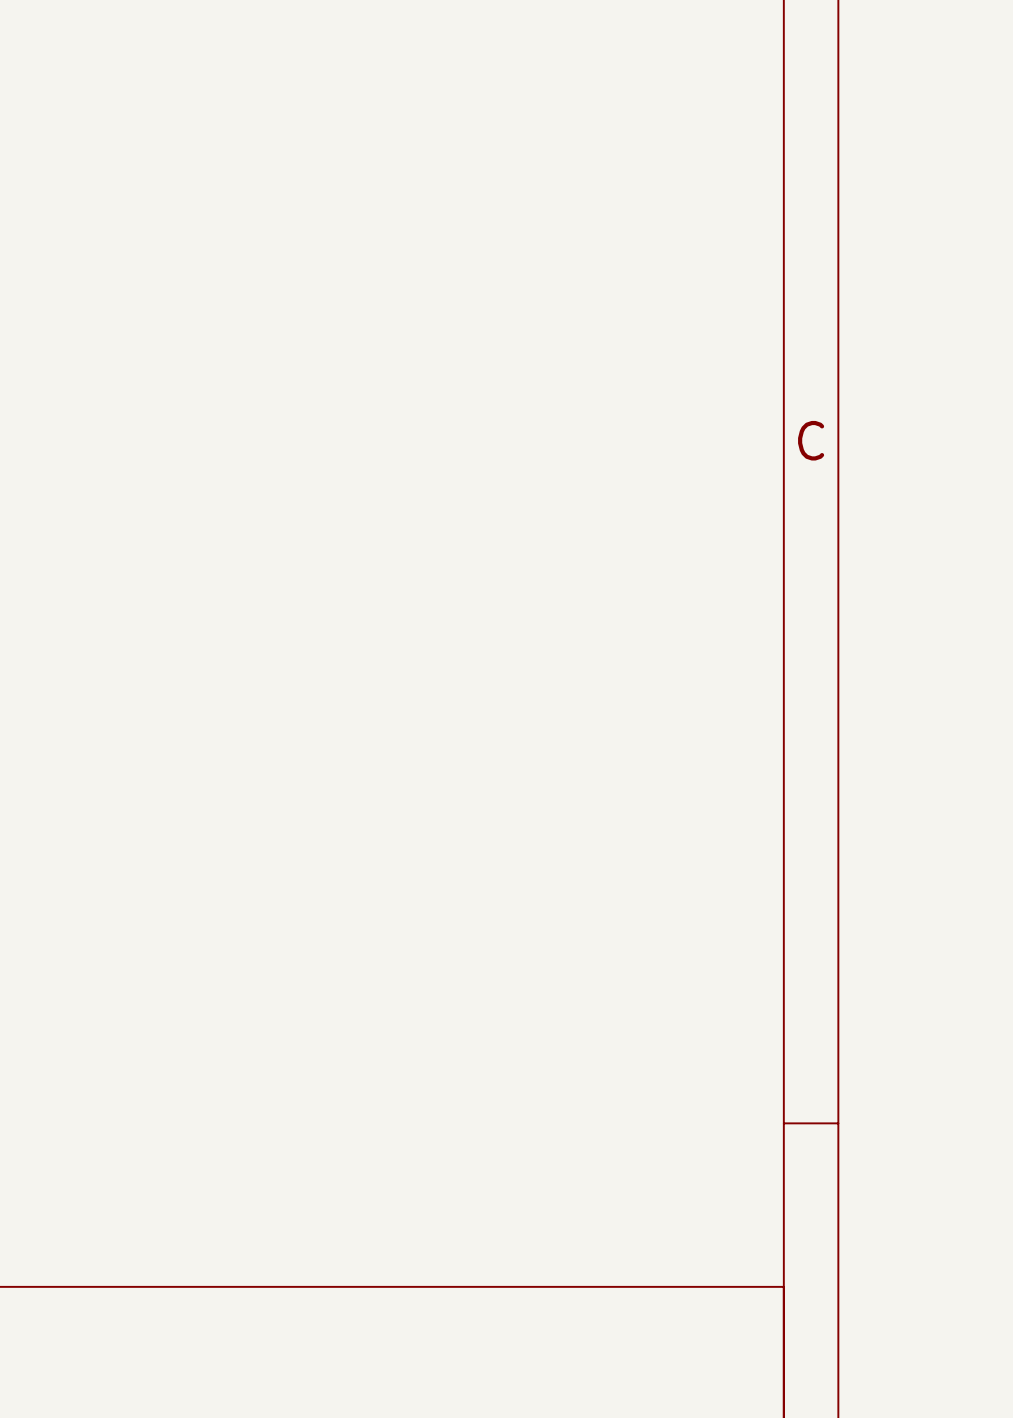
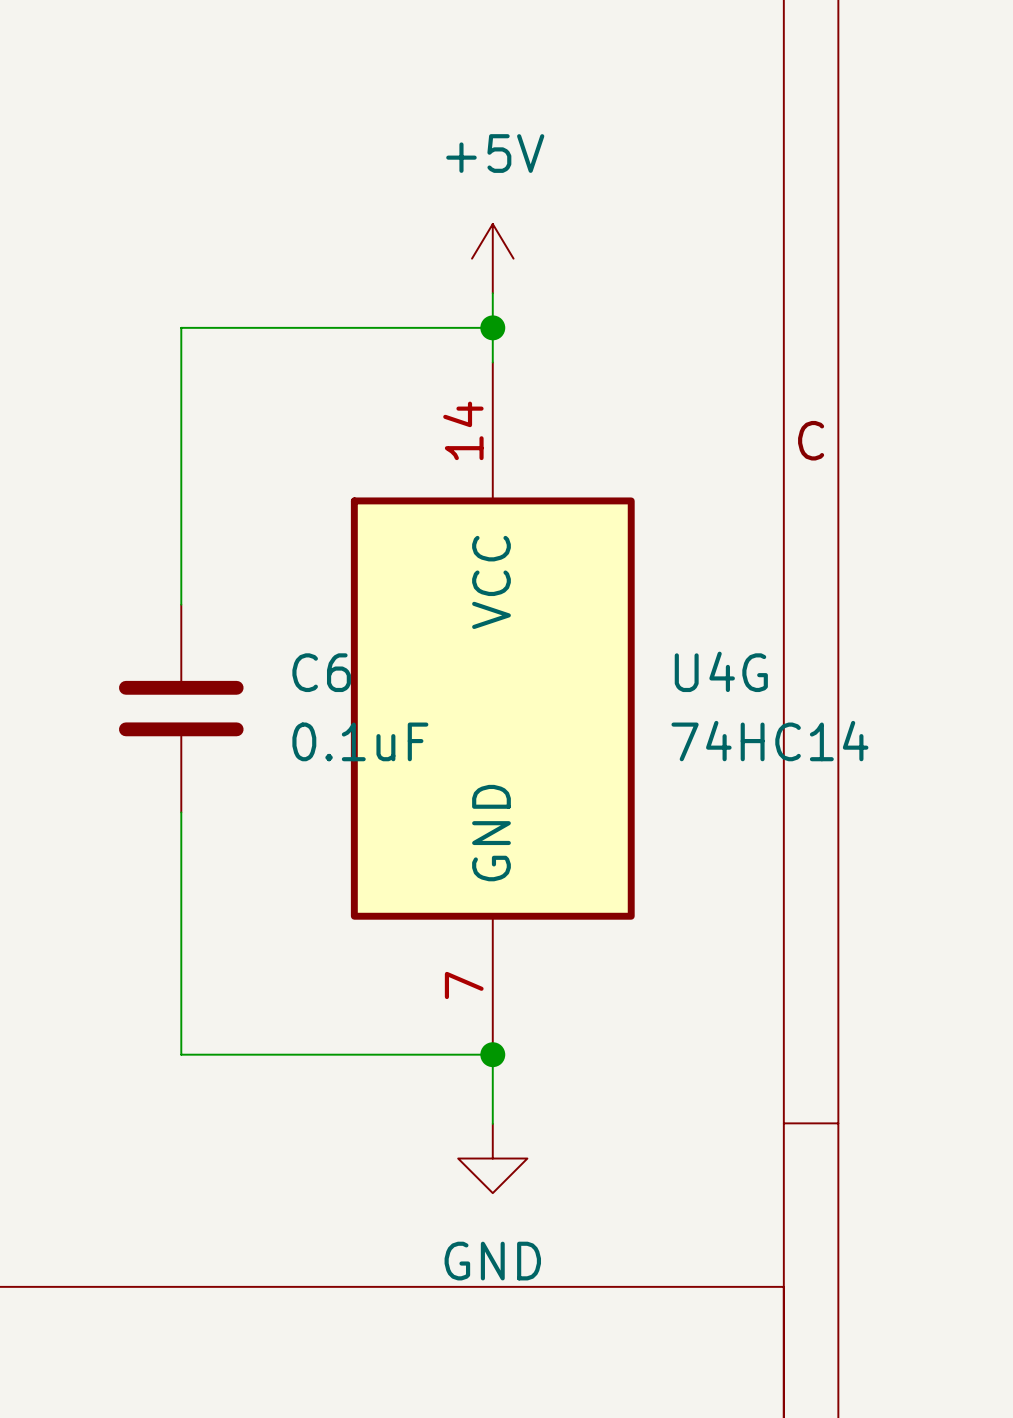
power symbol: none -> +5V (492, 258)
wire: none -> (492, 293) (492, 362)
wire: none -> (492, 327) (181, 327) (181, 604)
junction: none -> (492, 327)
C6: none -> 0.1uF (181, 708)
U4G: none -> 74HC14 (492, 708)
wire: none -> (181, 812) (181, 1054) (492, 1054) (492, 1123)
junction: none -> (492, 1054)
power symbol: none -> GND (492, 1158)

